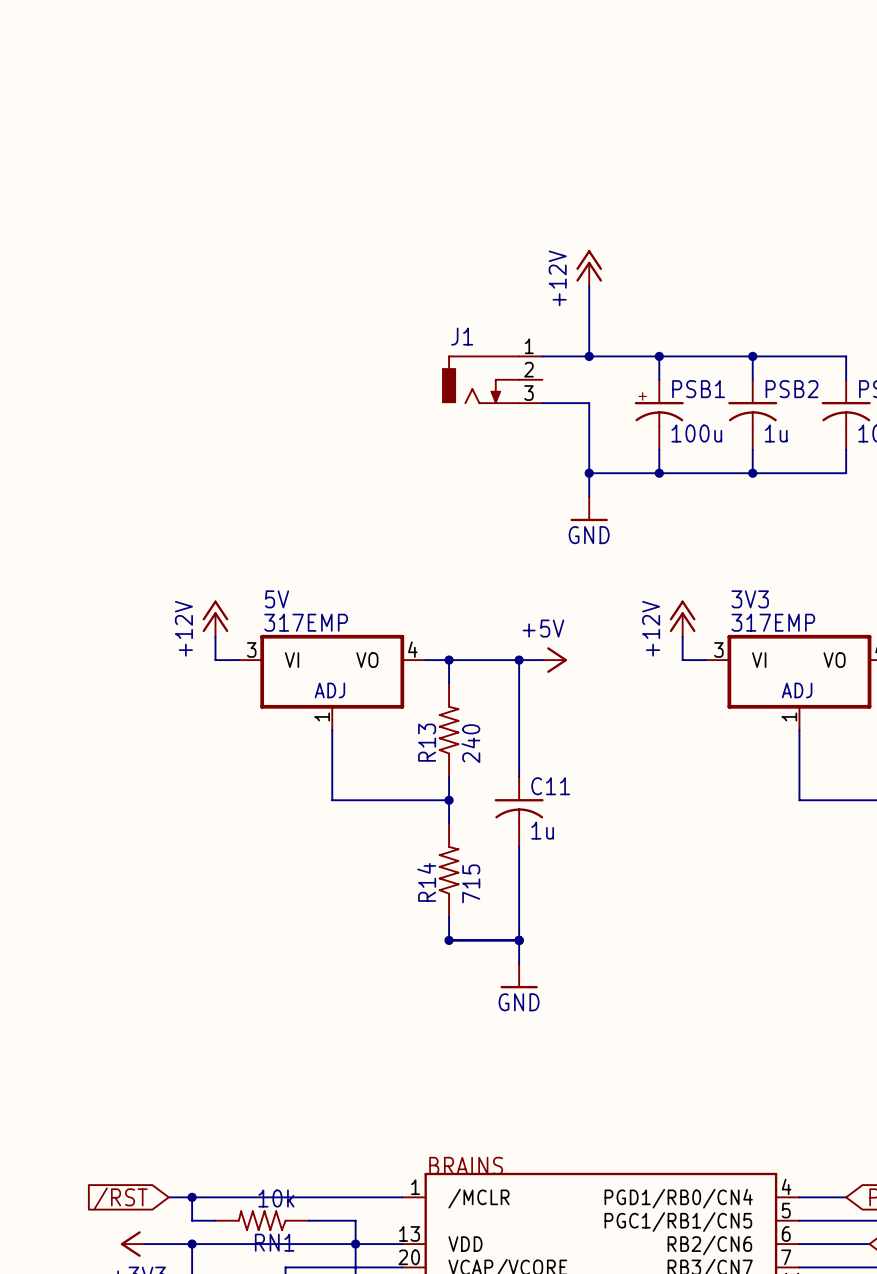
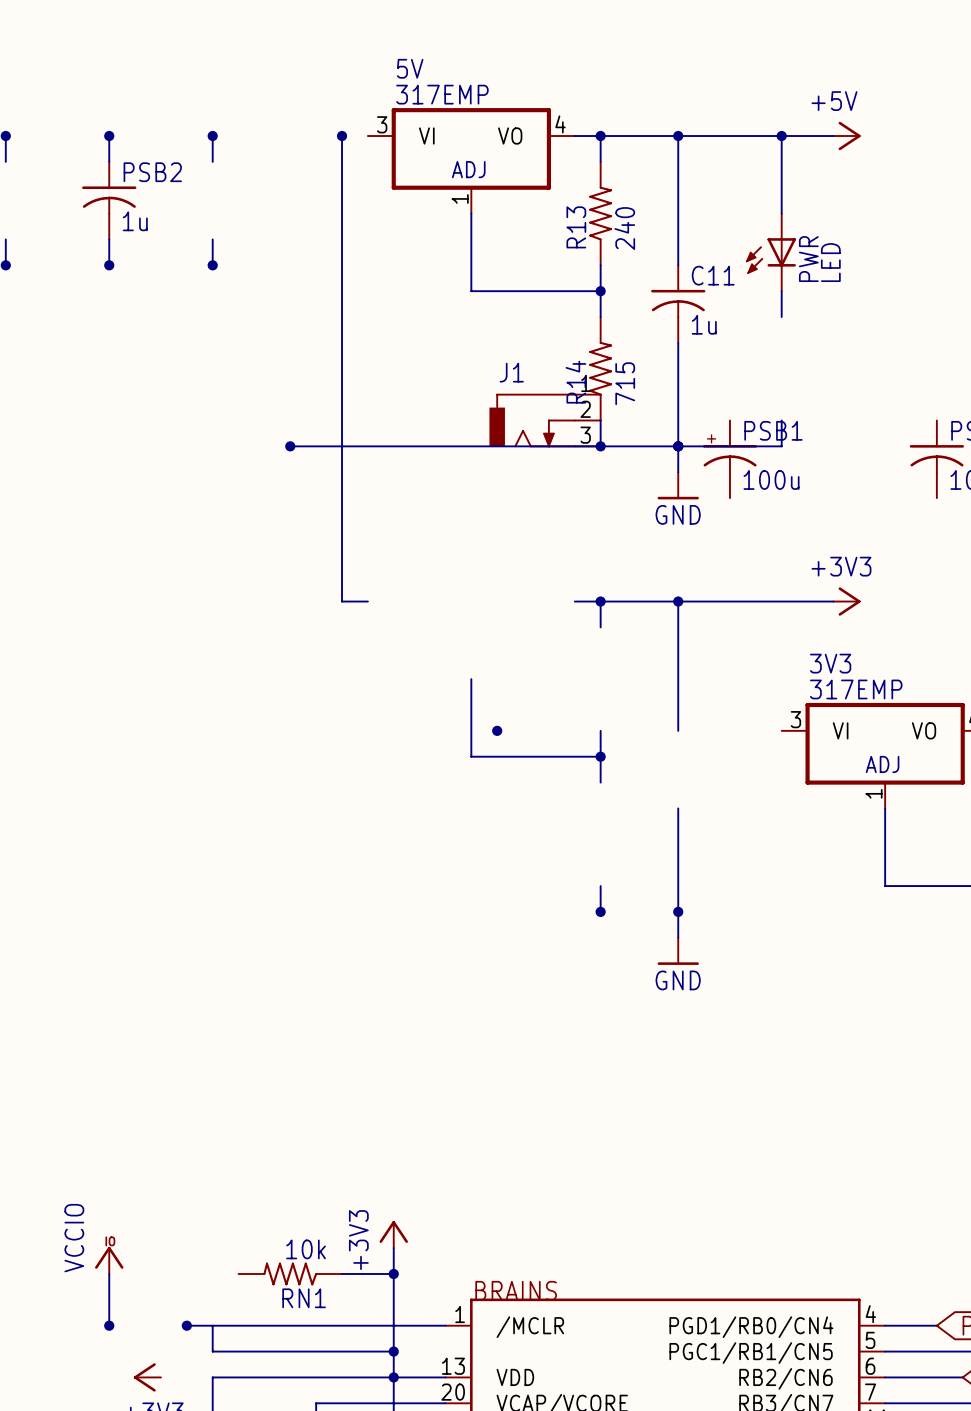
wire: none -> (5, 136) (5, 161)
junction: none -> (5, 136)
wire: none -> (109, 136) (109, 161)
junction: none -> (109, 136)
wire: none -> (212, 136) (212, 161)
junction: none -> (212, 136)
wire: none -> (342, 136) (342, 601) (367, 601)
junction: none -> (342, 136)
wire: none -> (574, 136) (833, 136)
wire: none -> (600, 136) (600, 161)
junction: none -> (600, 136)
wire: none -> (678, 136) (678, 265)
junction: none -> (678, 136)
junction: none -> (781, 136)
power symbol: none -> +5V (847, 136)
wire: none -> (471, 213) (471, 291) (600, 291)
wire: none -> (5, 239) (5, 265)
wire: none -> (109, 239) (109, 265)
wire: none -> (212, 239) (212, 265)
PWR: none -> LED (770, 252)
junction: none -> (5, 265)
junction: none -> (109, 265)
junction: none -> (212, 265)
wire: none -> (600, 265) (600, 317)
junction: none -> (600, 291)
power symbol: +12V (589, 268) -> none
wire: (589, 286) (589, 356) -> (781, 136) (781, 213)
wire: none -> (678, 342) (678, 472)
wire: (542, 356) (846, 356) (846, 379) -> none
junction: (589, 356) -> none
wire: (659, 356) (659, 379) -> (781, 291) (781, 317)
junction: (659, 356) -> none
wire: (752, 356) (752, 379) -> none
junction: (752, 356) -> none
wire: none -> (600, 420) (600, 446) (290, 446)
junction: none -> (290, 446)
junction: none -> (600, 446)
wire: (589, 403) (589, 496) -> (652, 446) (781, 446) (781, 420)
junction: none -> (678, 446)
PSB2 position: (752, 414) -> (109, 200)
wire: (659, 449) (659, 473) -> none
wire: (752, 449) (752, 473) -> none
wire: (846, 449) (846, 473) (589, 473) -> none
junction: (589, 473) -> none
junction: (659, 473) -> none
junction: (752, 473) -> none
power symbol position: GND (589, 508) -> GND (678, 485)
wire: none -> (574, 601) (833, 601)
junction: none -> (600, 601)
junction: none -> (678, 601)
power symbol: none -> +3V3 (847, 601)
power symbol: +12V (215, 618) -> none
power symbol: +12V (682, 618) -> none
wire: (215, 636) (215, 660) (238, 660) -> none
wire: (682, 636) (682, 660) (706, 660) -> none
wire: (425, 660) (542, 660) -> (600, 782) (600, 730)
wire: (449, 660) (449, 683) -> (600, 601) (600, 627)
wire: (519, 660) (519, 776) -> (678, 601) (678, 730)
junction position: (519, 660) -> (600, 756)
power symbol: +5V (554, 660) -> none
5V position: (332, 682) -> (471, 160)
wire: (332, 730) (332, 800) (449, 800) -> (471, 679) (471, 756) (600, 756)
R13 position: (449, 730) -> (600, 213)
wire: (449, 776) (449, 823) -> none
junction: (449, 800) -> none
wire: none -> (600, 886) (600, 911)
C11 position: (519, 811) -> (678, 304)
junction: none -> (600, 911)
junction: none -> (678, 911)
wire: (519, 846) (519, 963) -> (678, 808) (678, 937)
R14 position: (449, 870) -> (600, 368)
wire: (449, 917) (449, 940) (519, 940) -> none
junction: (449, 940) -> none
junction: (519, 940) -> none
power symbol position: GND (519, 976) -> GND (678, 951)
power symbol: none -> +3V3 (393, 1234)
wire: none -> (393, 1248) (393, 1351)
power symbol: none -> VCCIO (109, 1260)
wire: none -> (109, 1273) (109, 1325)
junction: none -> (393, 1273)
junction: none -> (109, 1325)
junction position: (192, 1197) -> (186, 1325)
global label: /RST (120, 1198) -> none
RN1 position: (262, 1220) -> (290, 1273)
junction: none -> (393, 1351)
wire: (145, 1244) (192, 1244) -> (342, 1273) (393, 1273)
junction: (192, 1244) -> none

